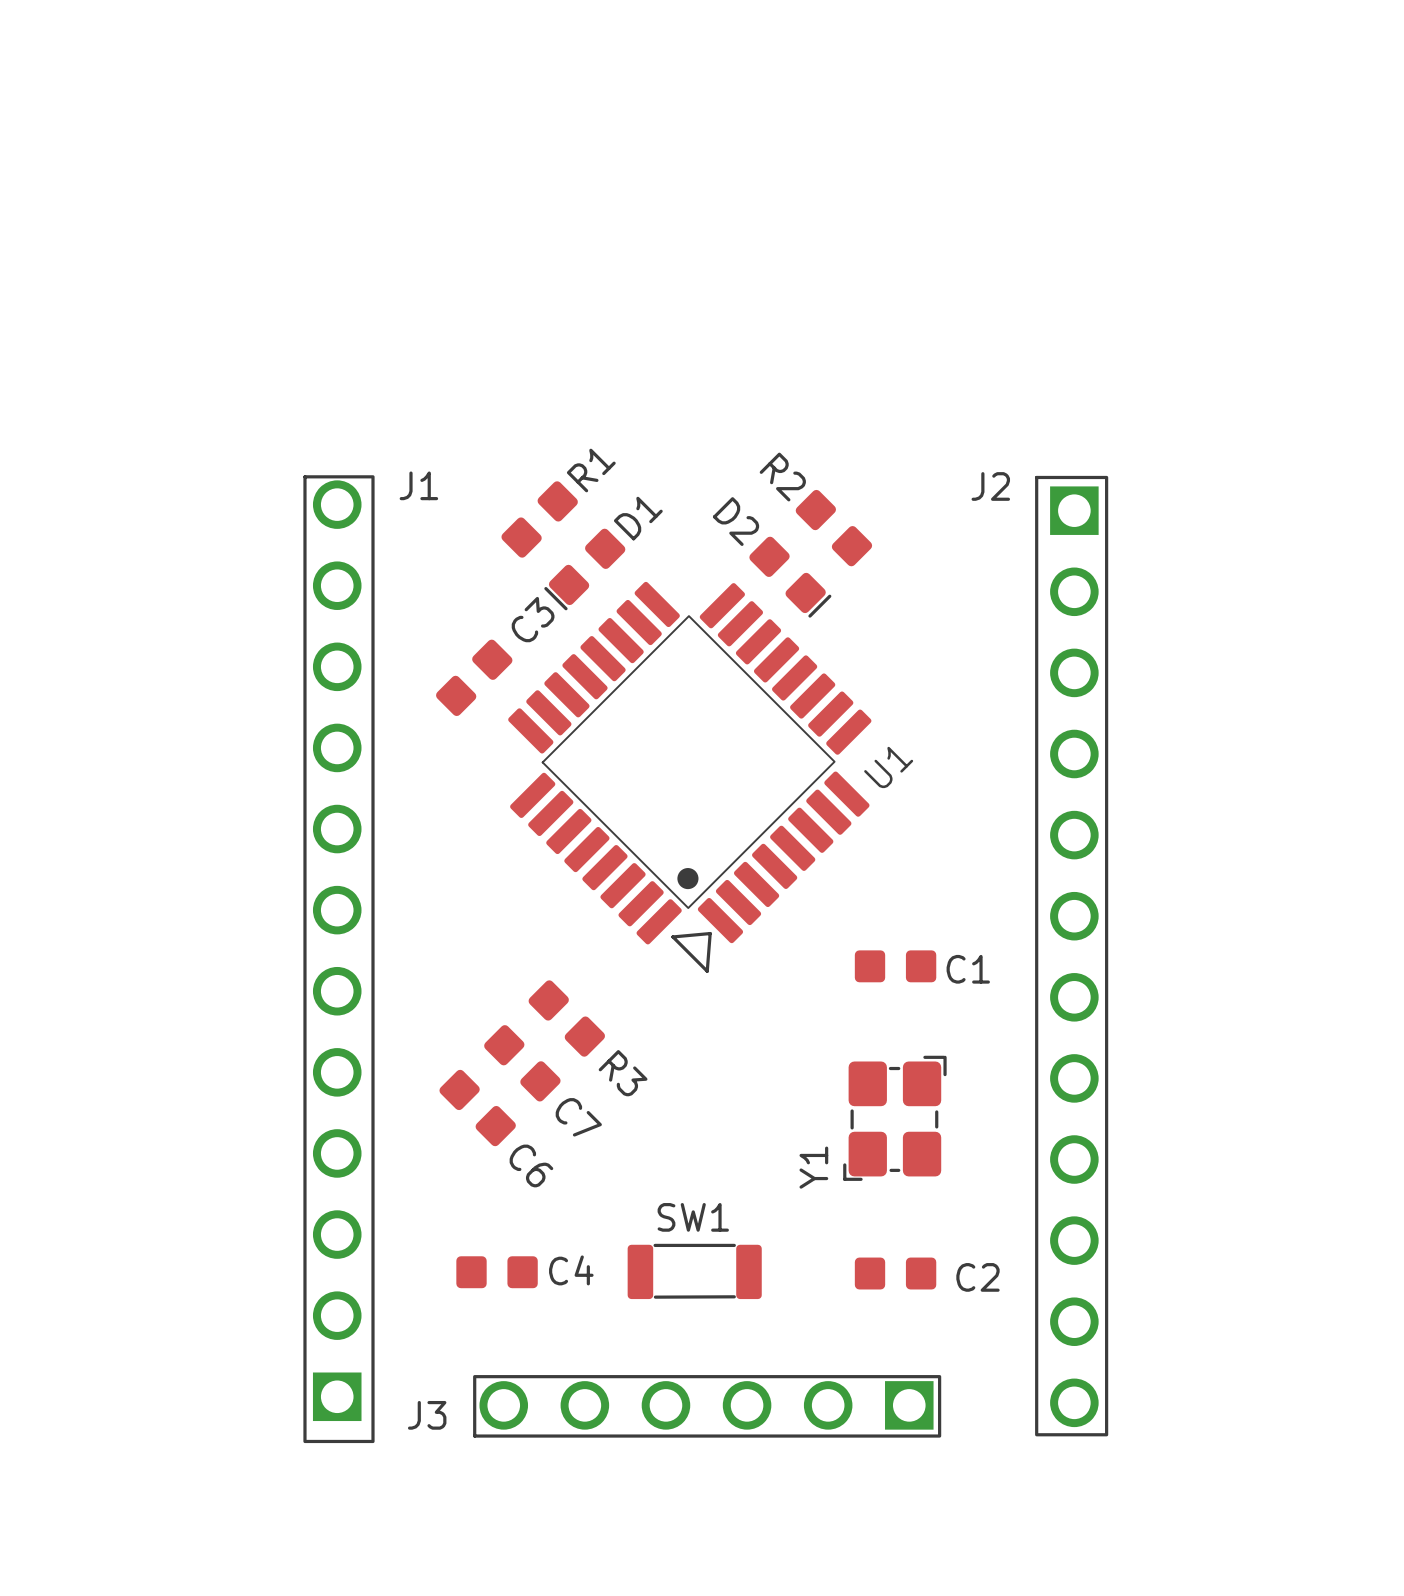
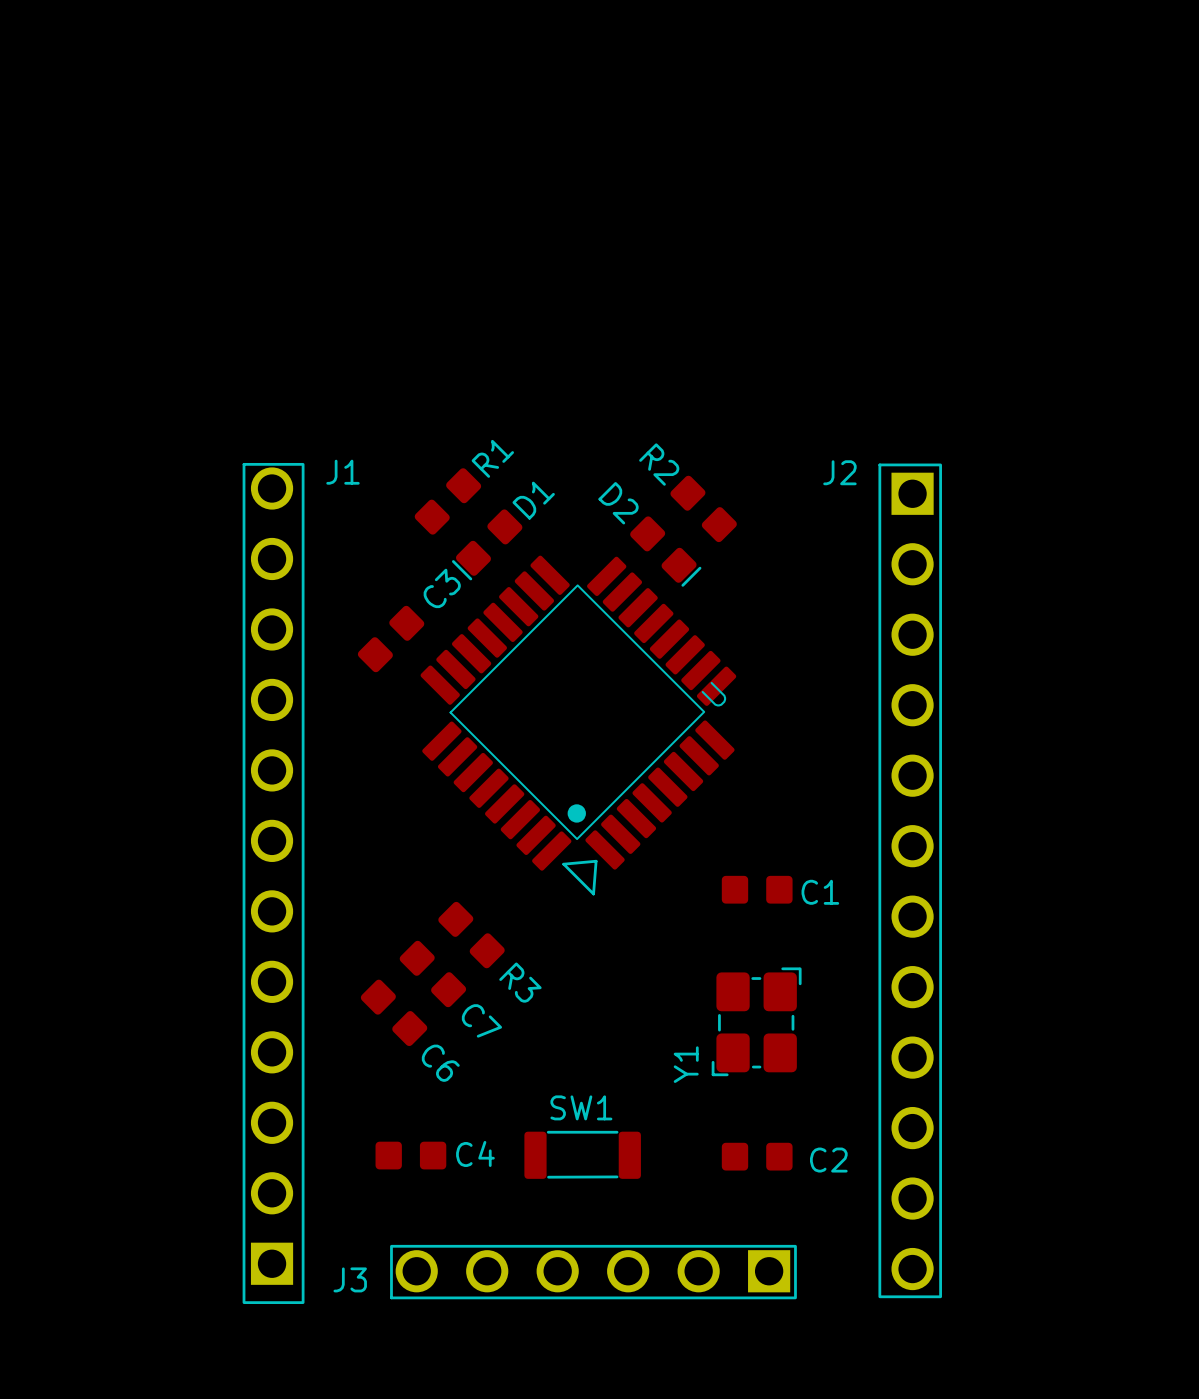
part text: none -> U (713, 694)
part text: U1 (888, 767) -> none

